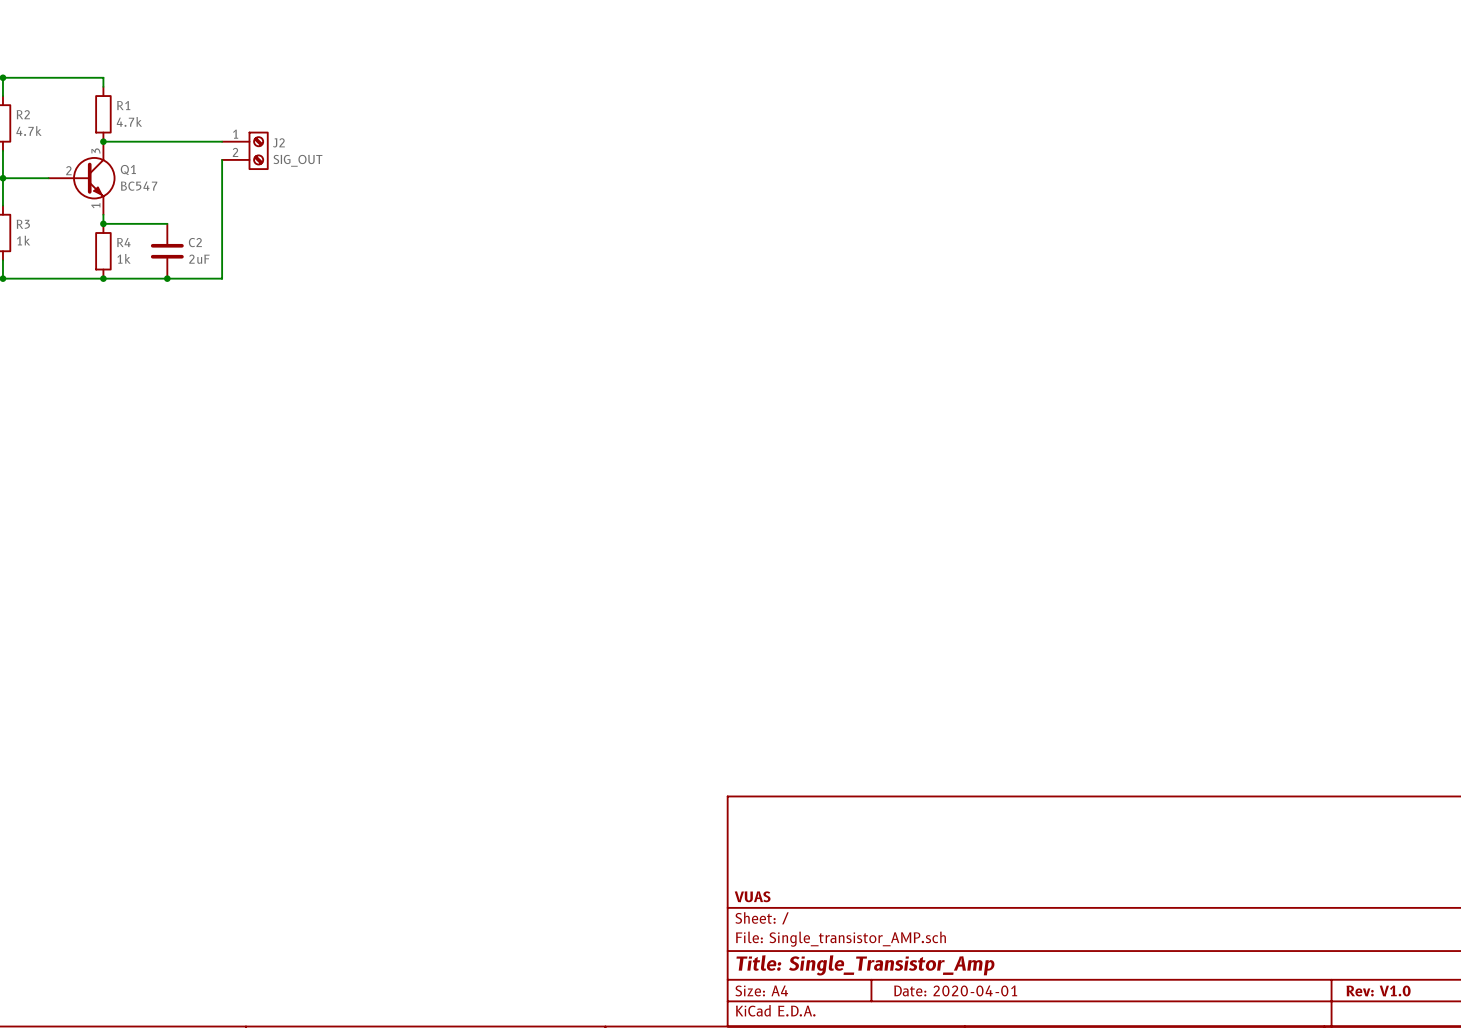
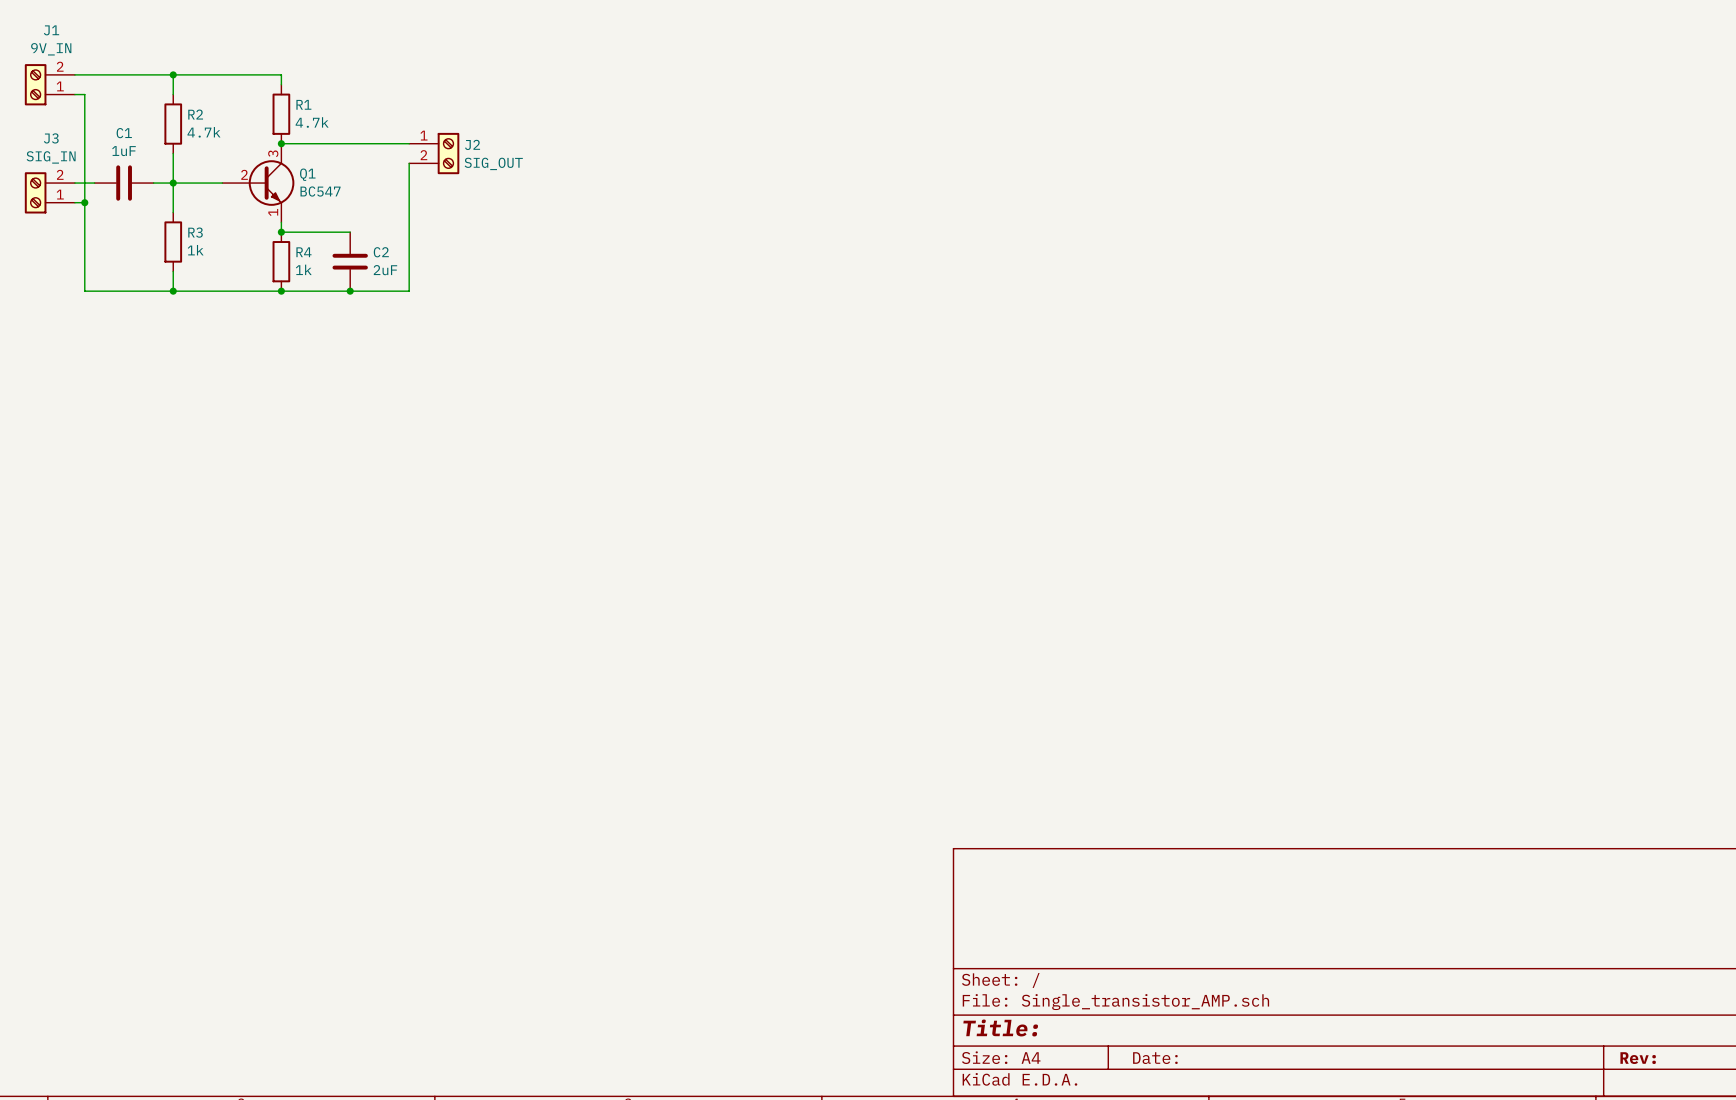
title block: VUAS (752, 896) -> none
title block: Title: Single_Transistor_Amp (865, 965) -> Title: (1000, 1027)
title block: Date: 2020-04-01 (955, 990) -> Date: (1155, 1058)
title block: Rev: V1.0 (1378, 990) -> Rev: (1638, 1058)

